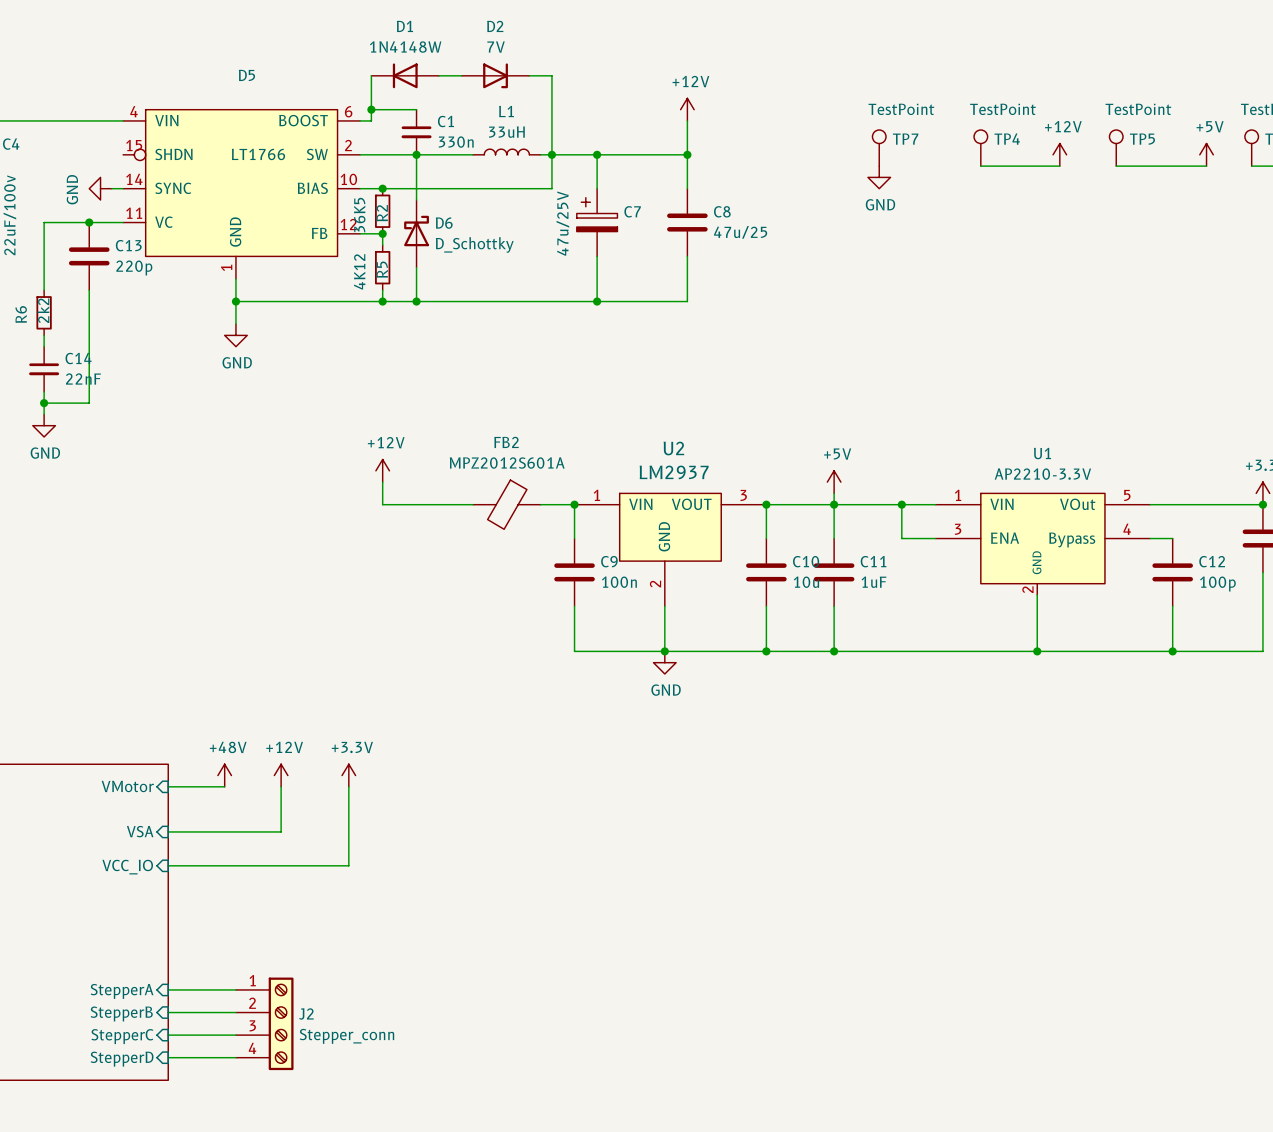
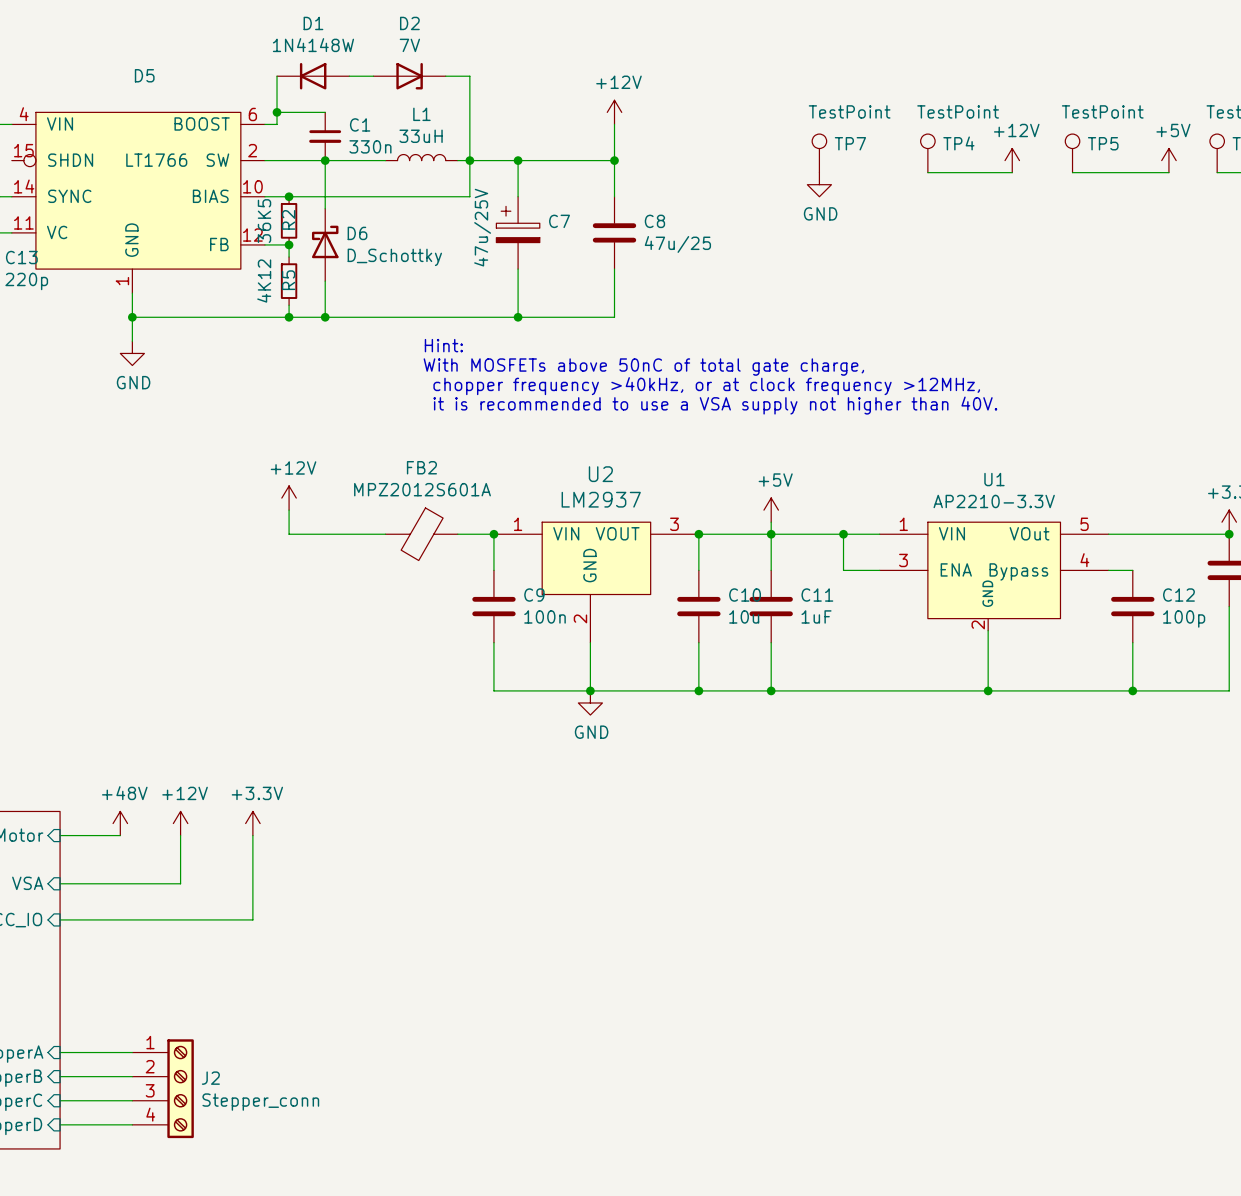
text: none -> Hint: (443, 345)
text: none -> With MOSFETs above 50nC of total gate charge, (643, 367)
text: none -> chopper frequency >40kHz, or at clock frequency >12MHz, (706, 386)
text: none -> it is recommended to use a VSA supply not higher than 40V. (715, 405)

